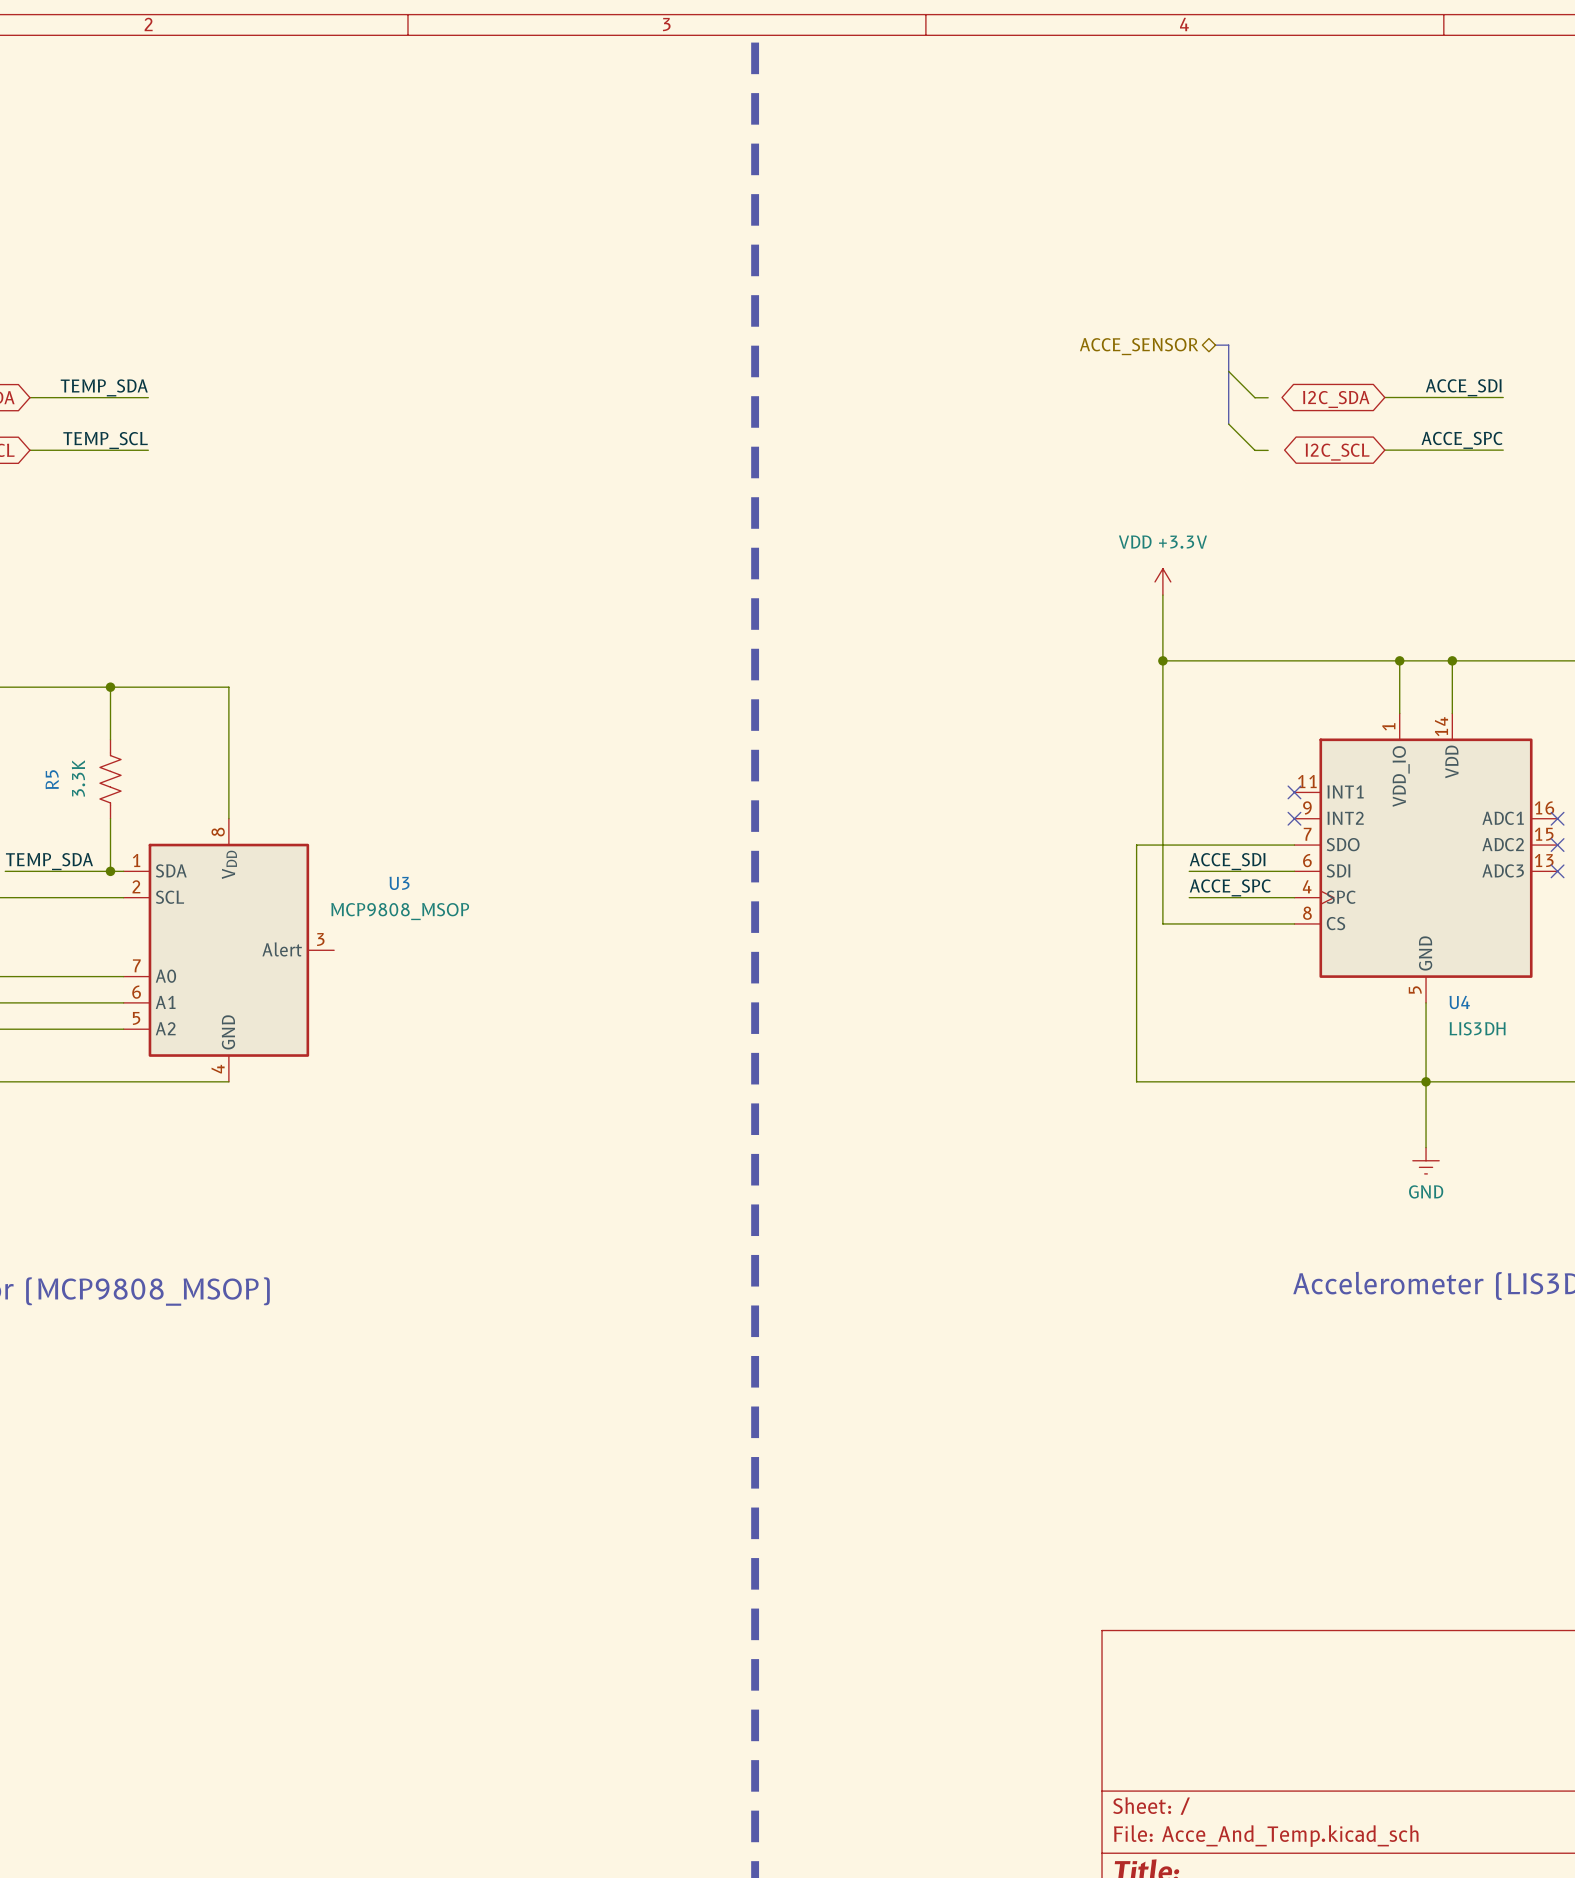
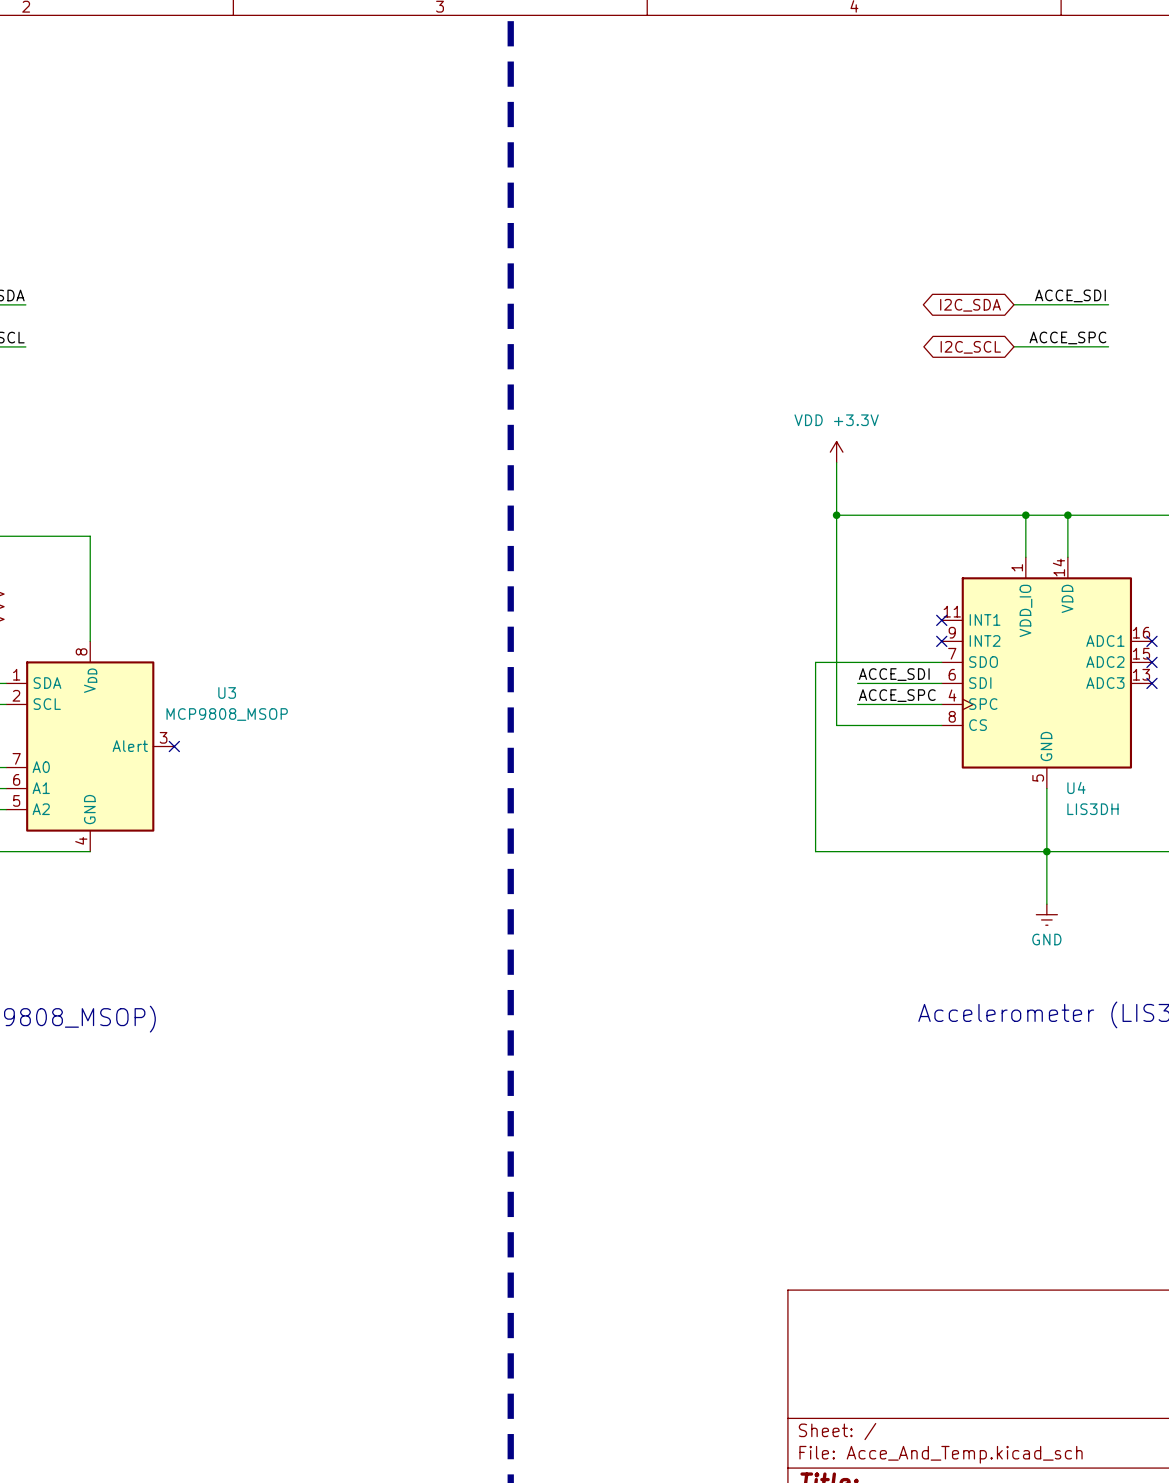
bus: (1215, 345) (1228, 345) (1228, 424) -> none
hierarchical label: ACCE_SENSOR (1139, 346) -> none
wire: (1228, 371) (1255, 397) (1268, 397) -> none
wire: (1228, 424) (1255, 450) (1268, 450) -> none
no-connect mark: none -> (174, 746)

